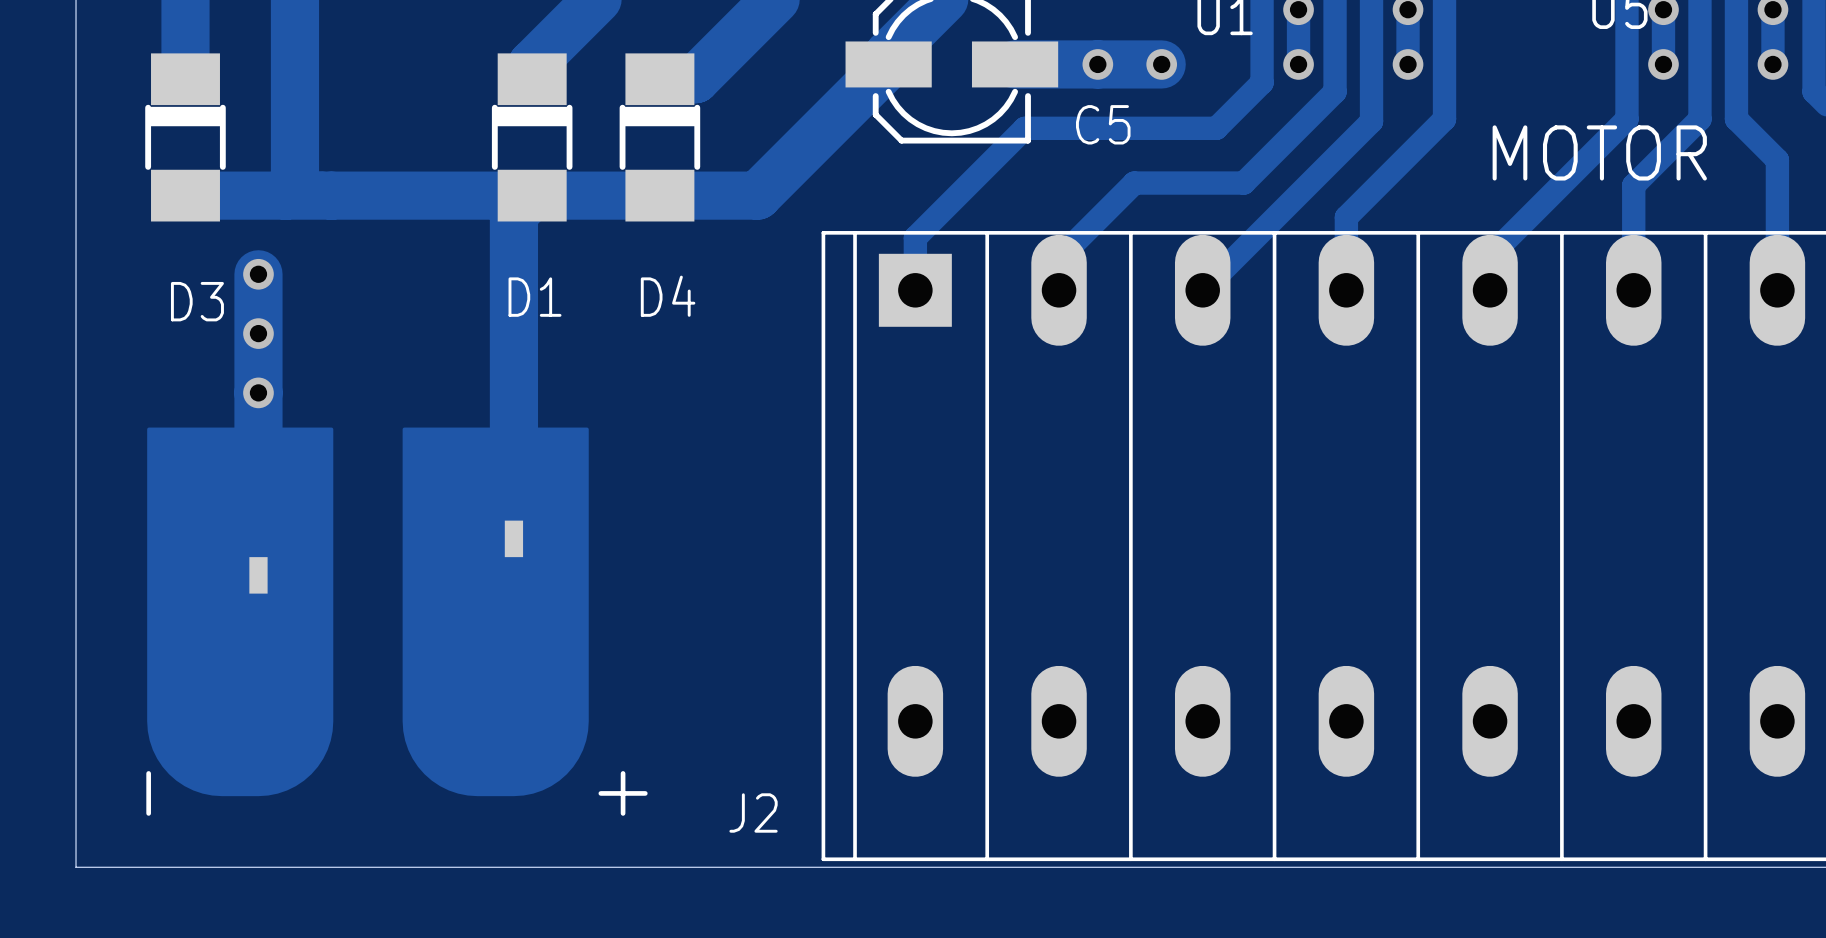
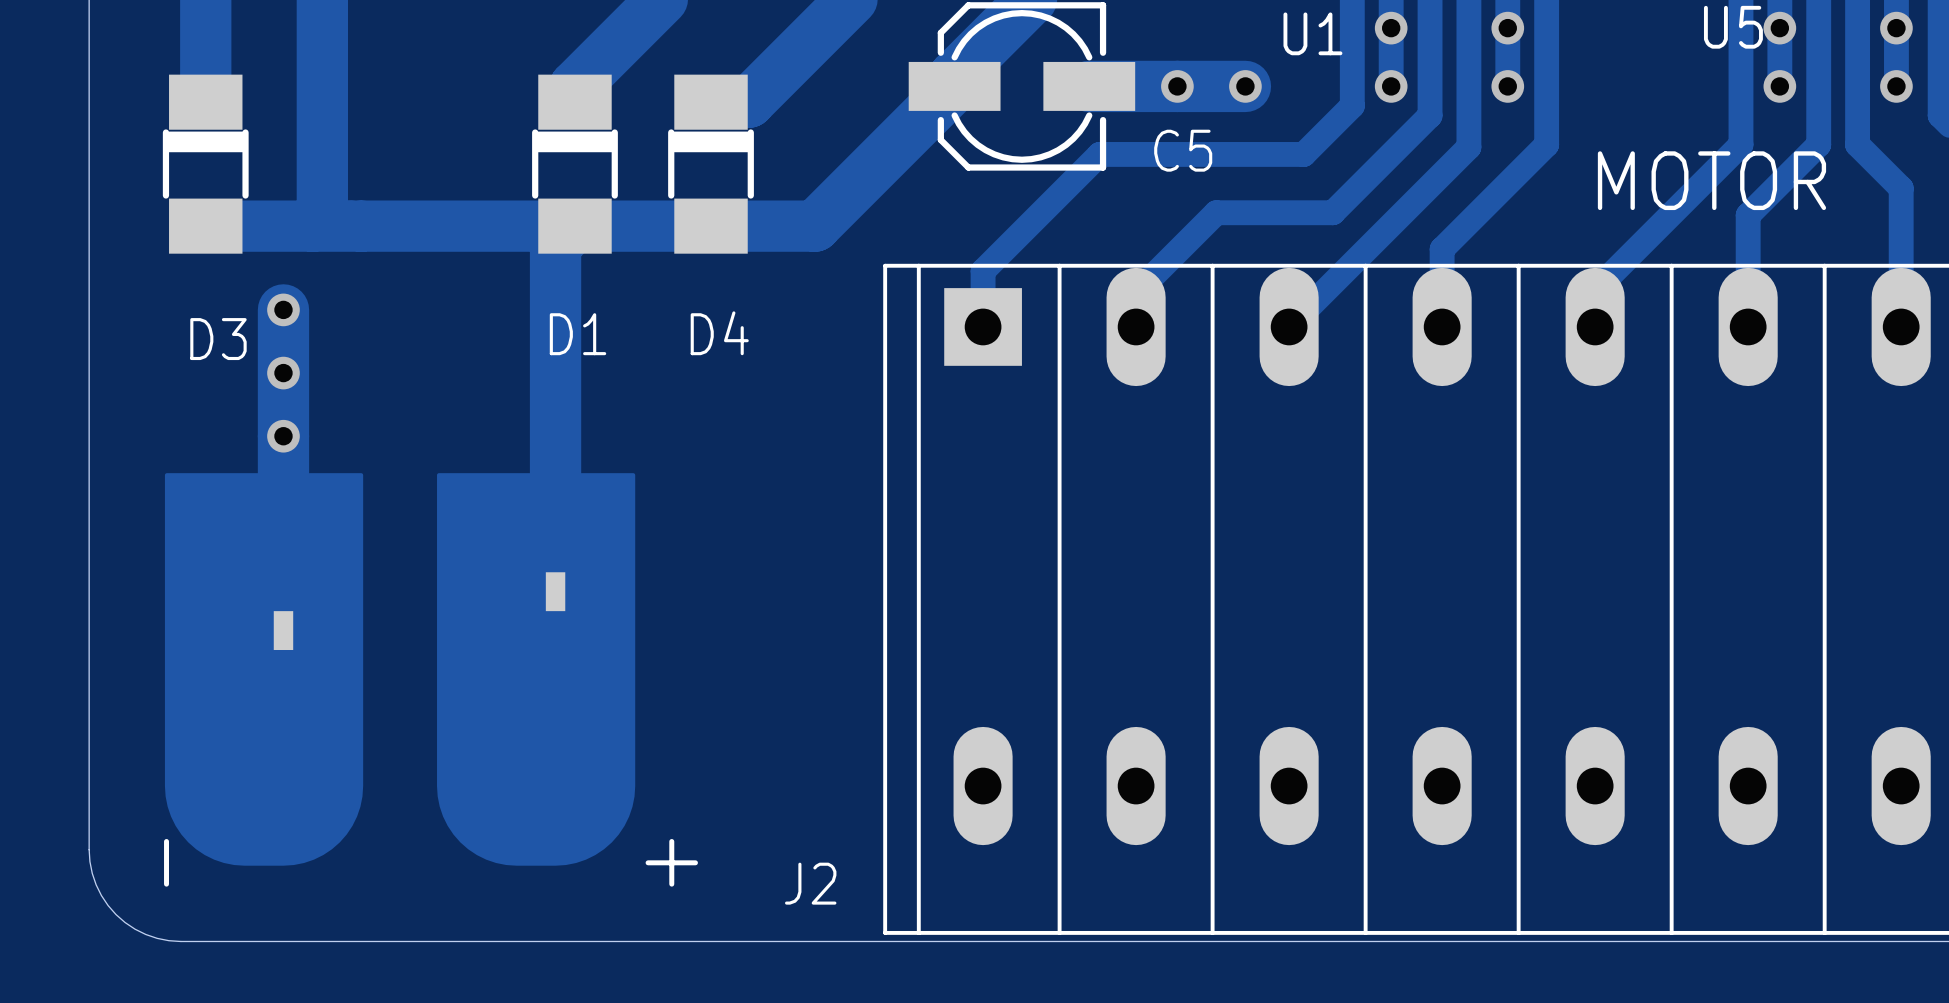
board edge: (76, 781) (76, 867) (162, 867) -> (89, 849) (92, 873) (96, 884) (108, 905) (116, 914) (125, 922) (145, 934) (157, 938) (180, 941)

